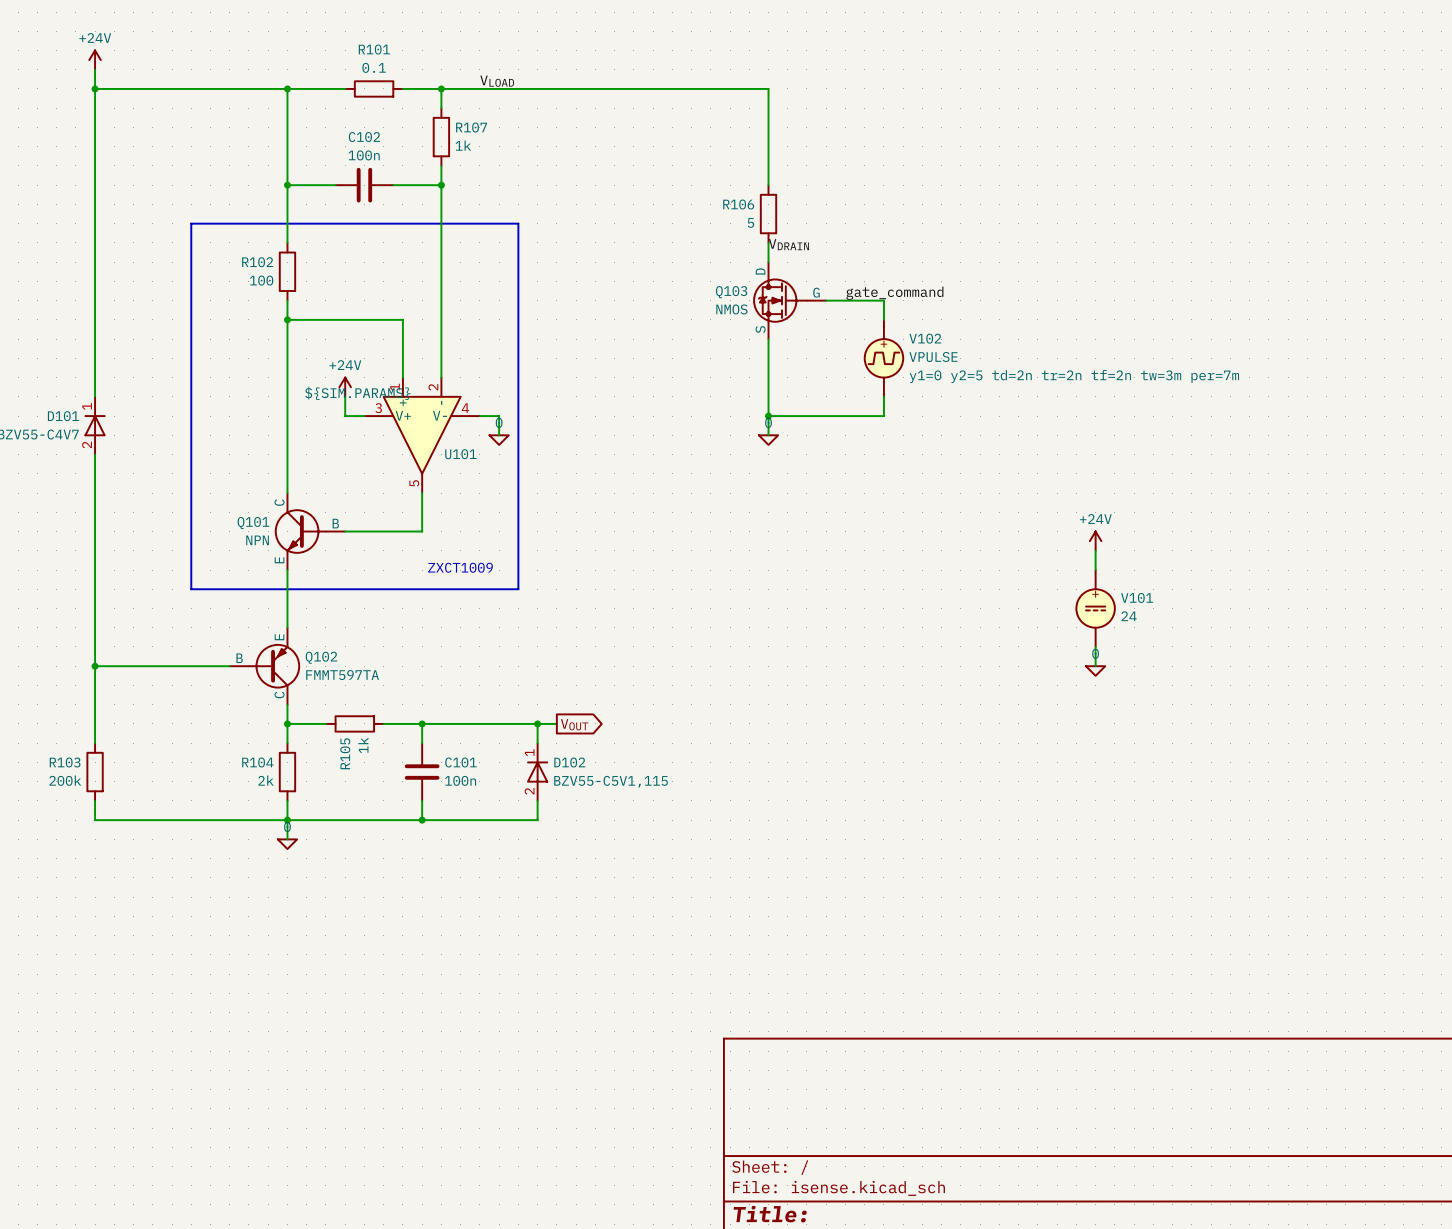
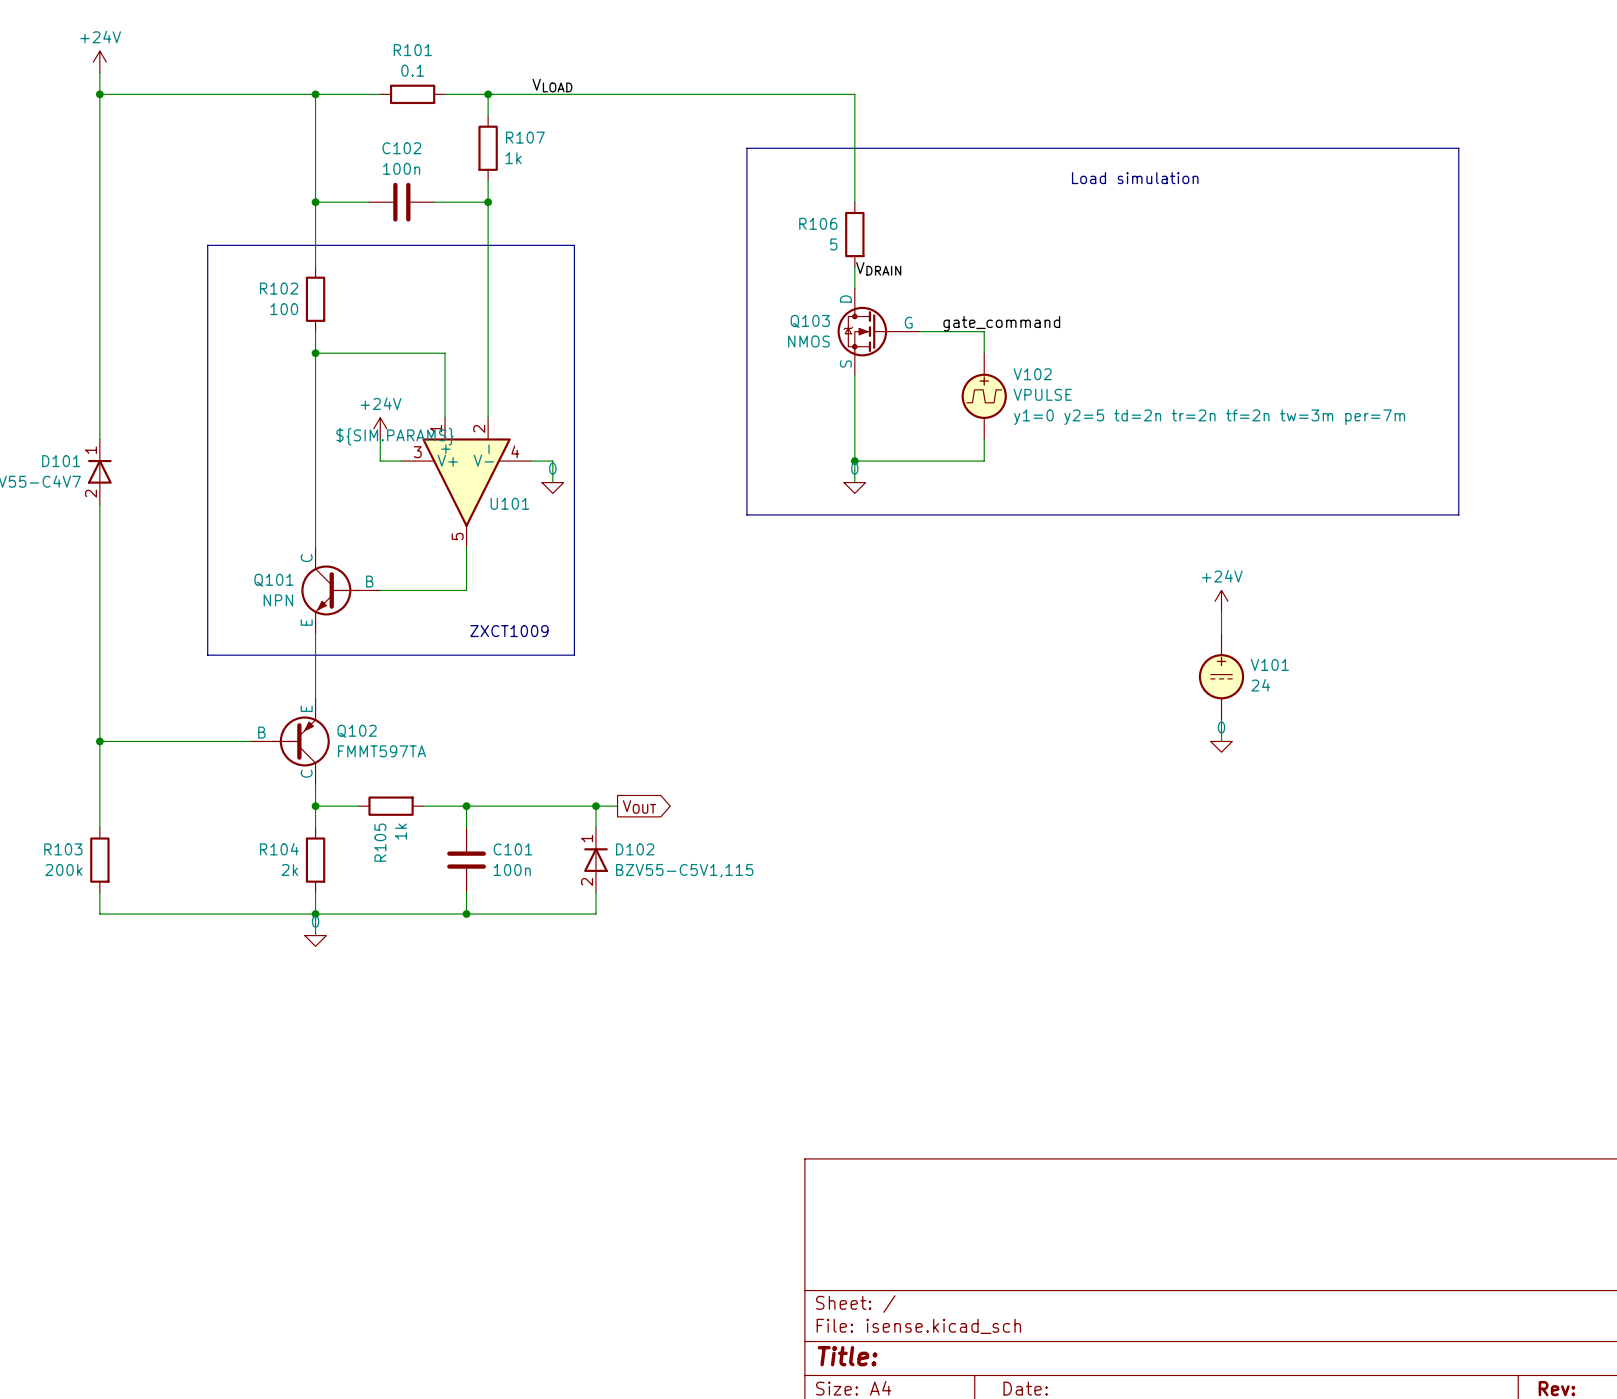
line: none -> (746, 148) (1458, 148) (1458, 514) (746, 514) (746, 148)
text: none -> Load simulation (1135, 178)

